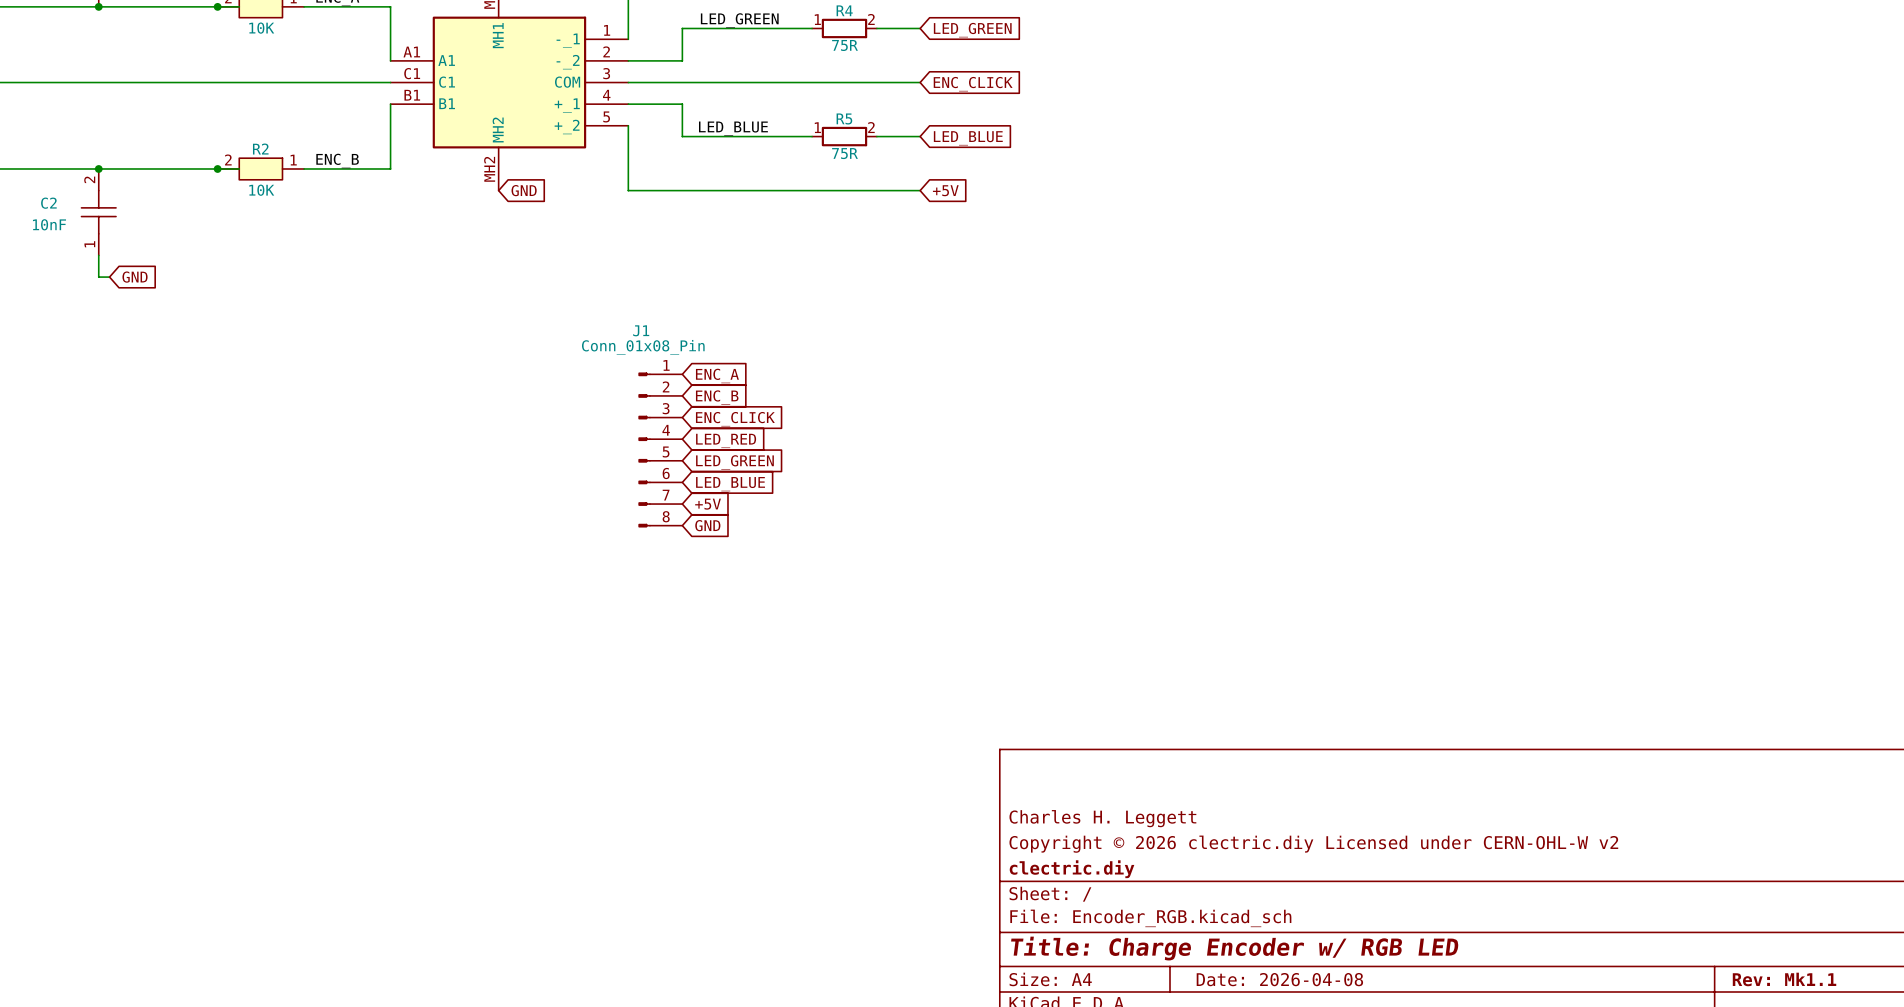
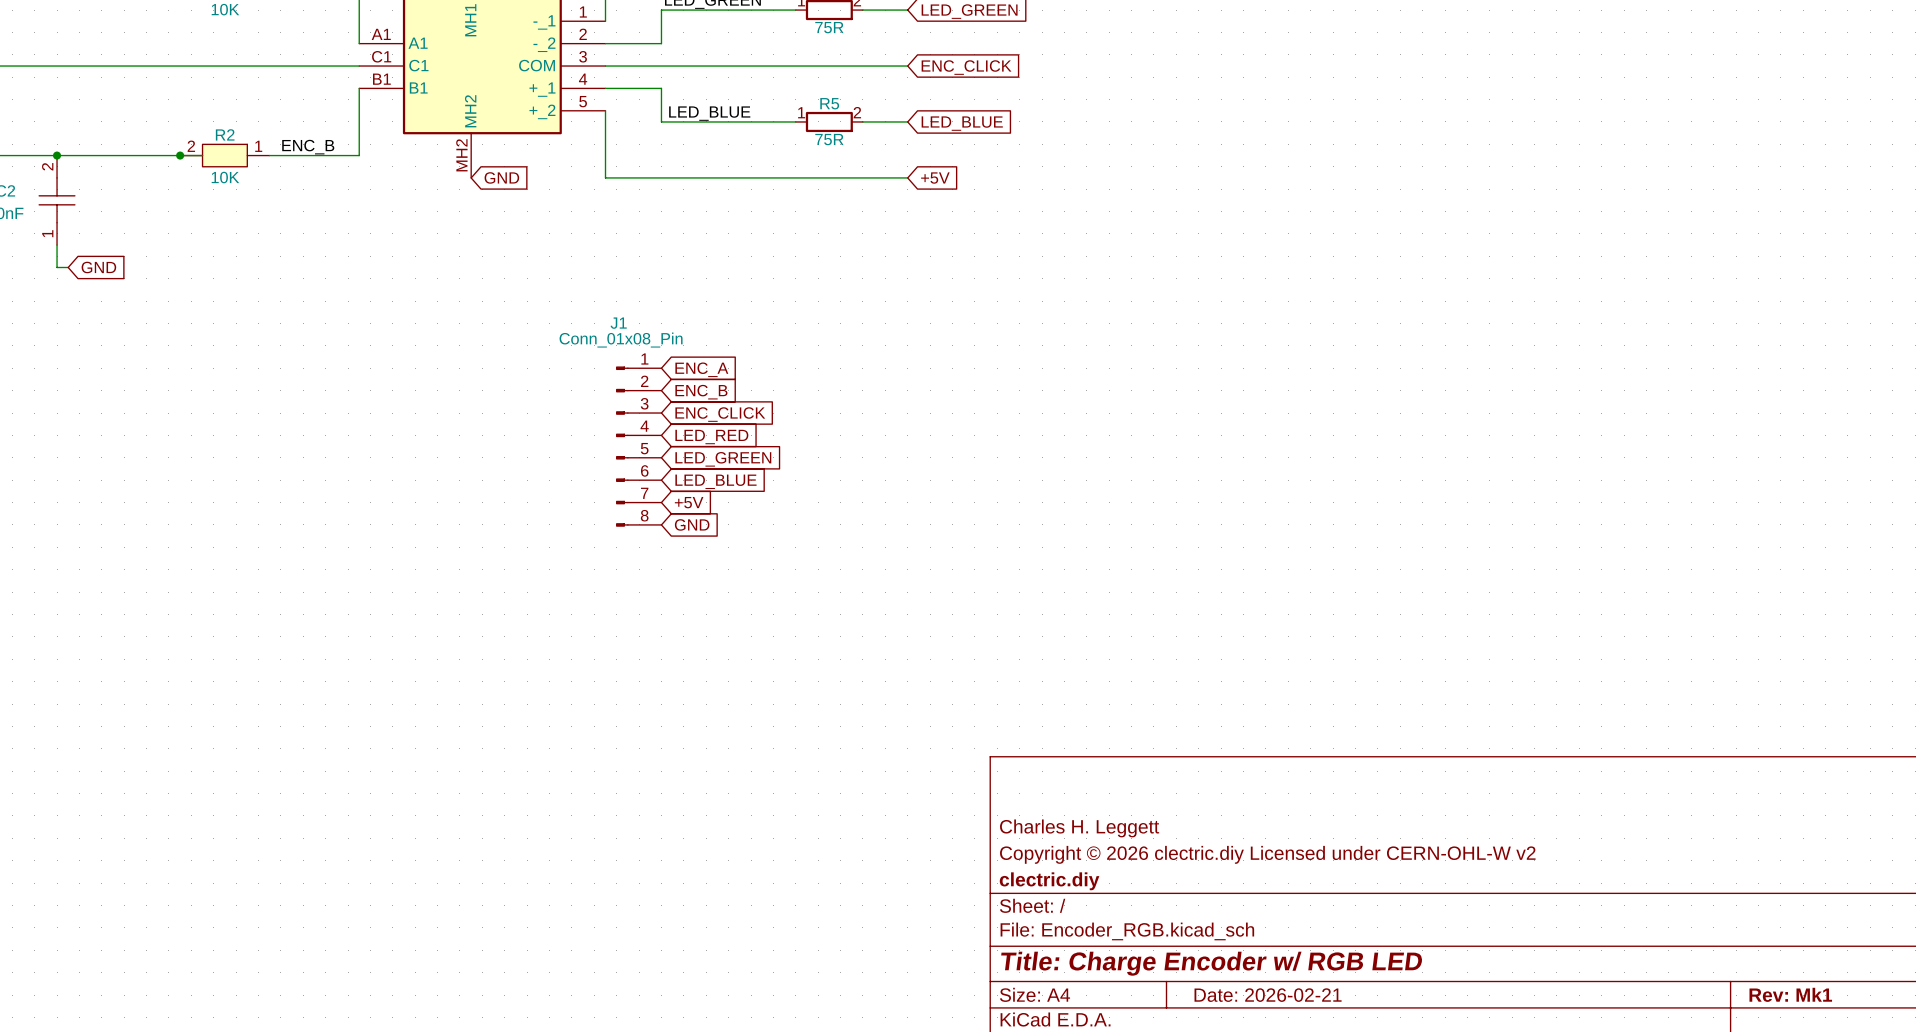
title block: Date: 2026-04-08 (1279, 979) -> Date: 2026-02-21 (1268, 995)
title block: Rev: Mk1.1 (1784, 979) -> Rev: Mk1 (1790, 994)

